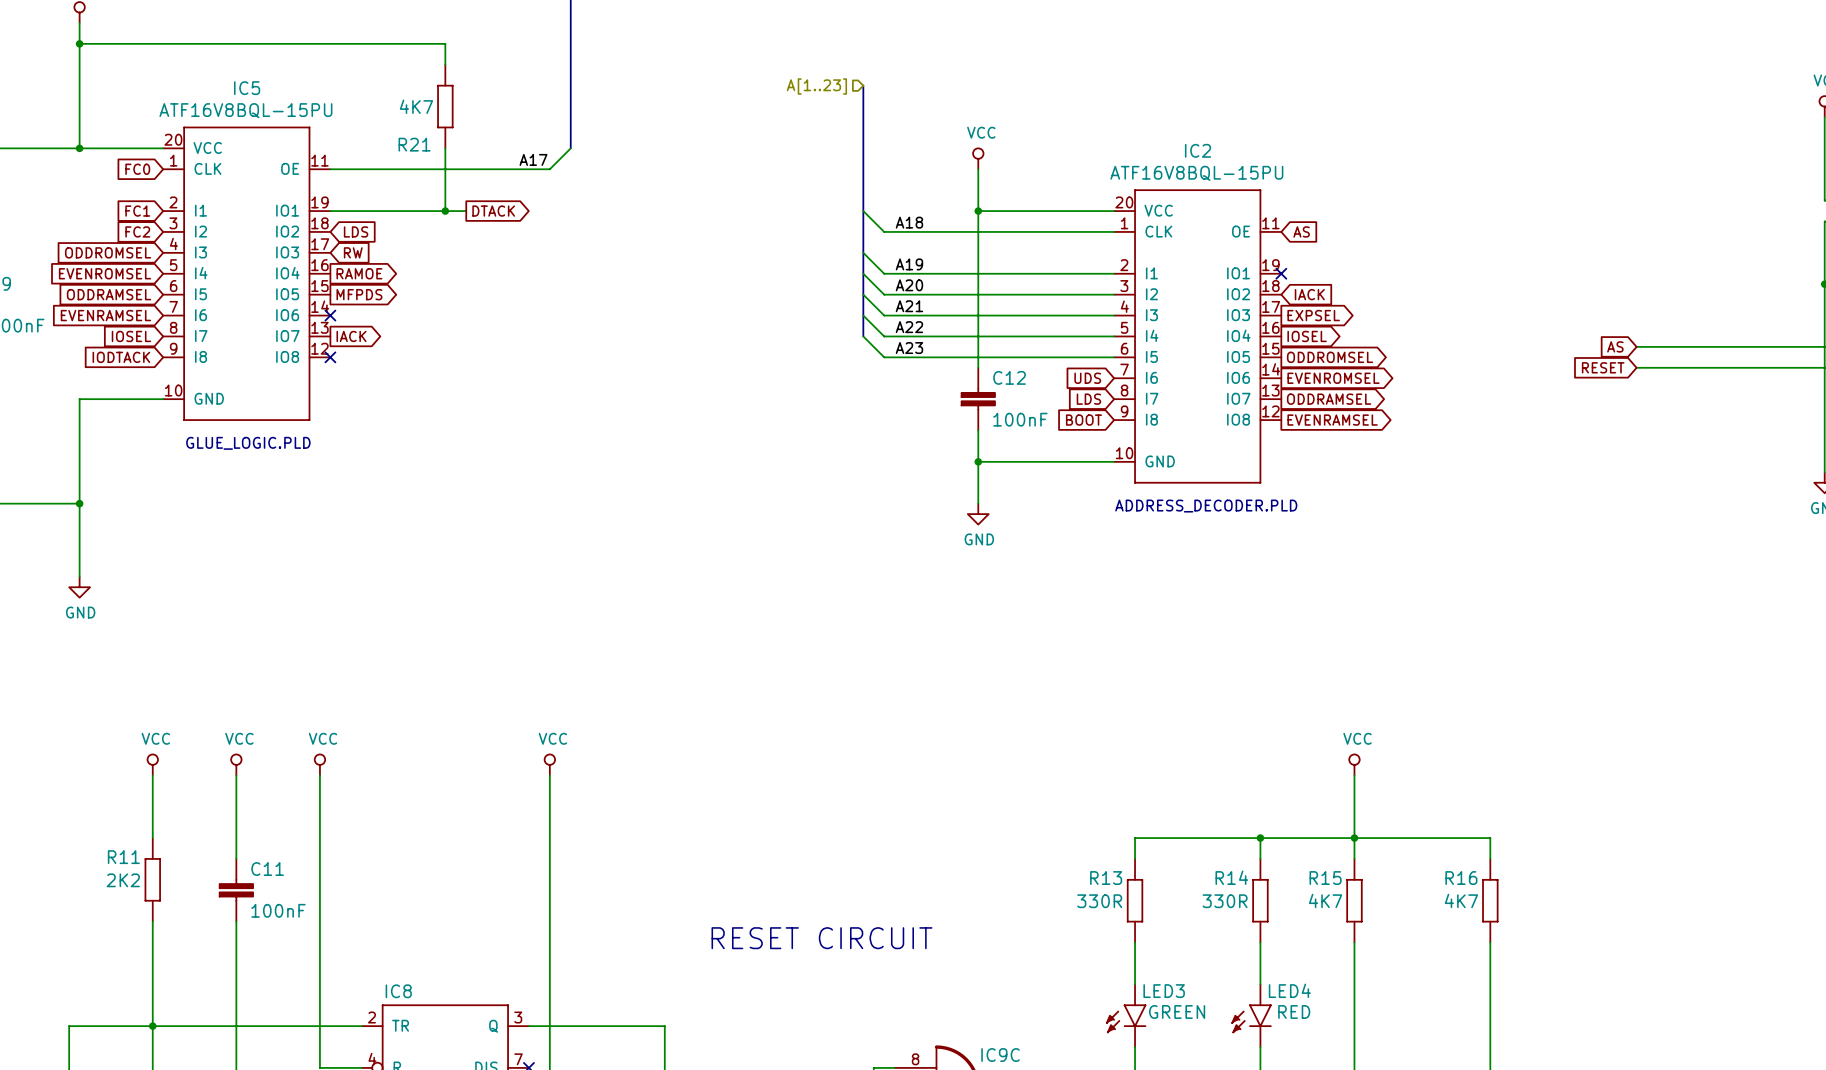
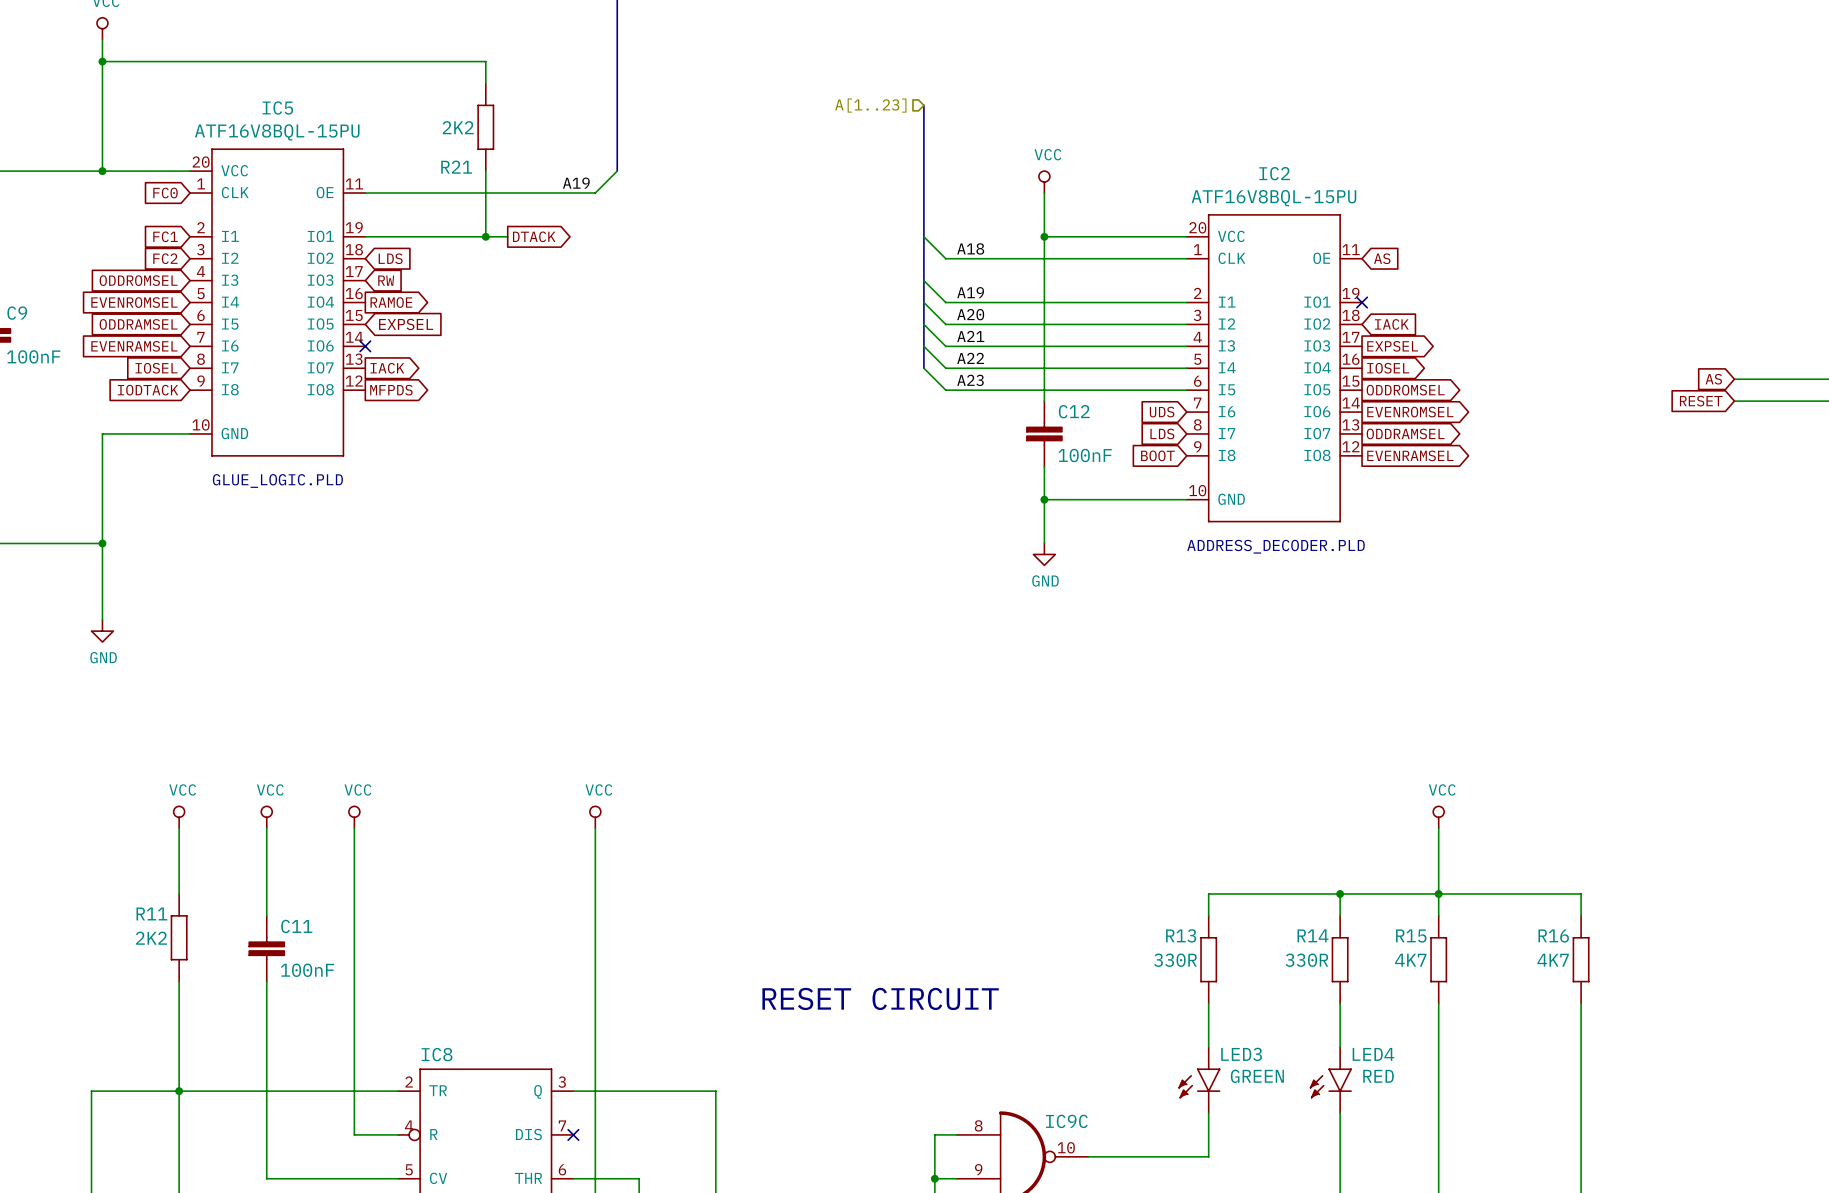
R21 value: 4K7 (416, 106) -> 2K2 (458, 127)
label: A17 (533, 159) -> A19 (576, 183)
global label shape: output (359, 294) -> input (406, 324)
global label: MFPDS (359, 294) -> EXPSEL (406, 324)
no-connect mark: (330, 357) -> none
global label: none -> MFPDS (391, 390)

